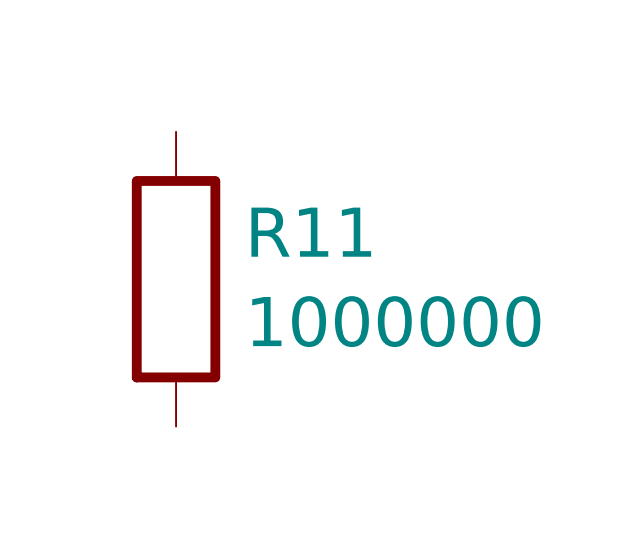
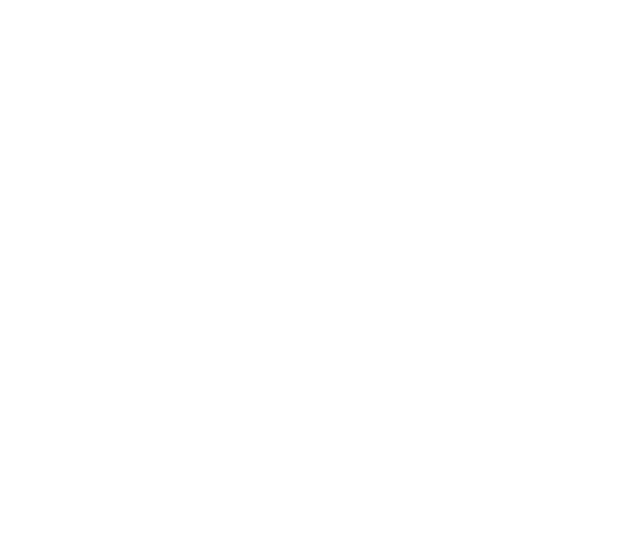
R11: 1000000 (176, 279) -> none

